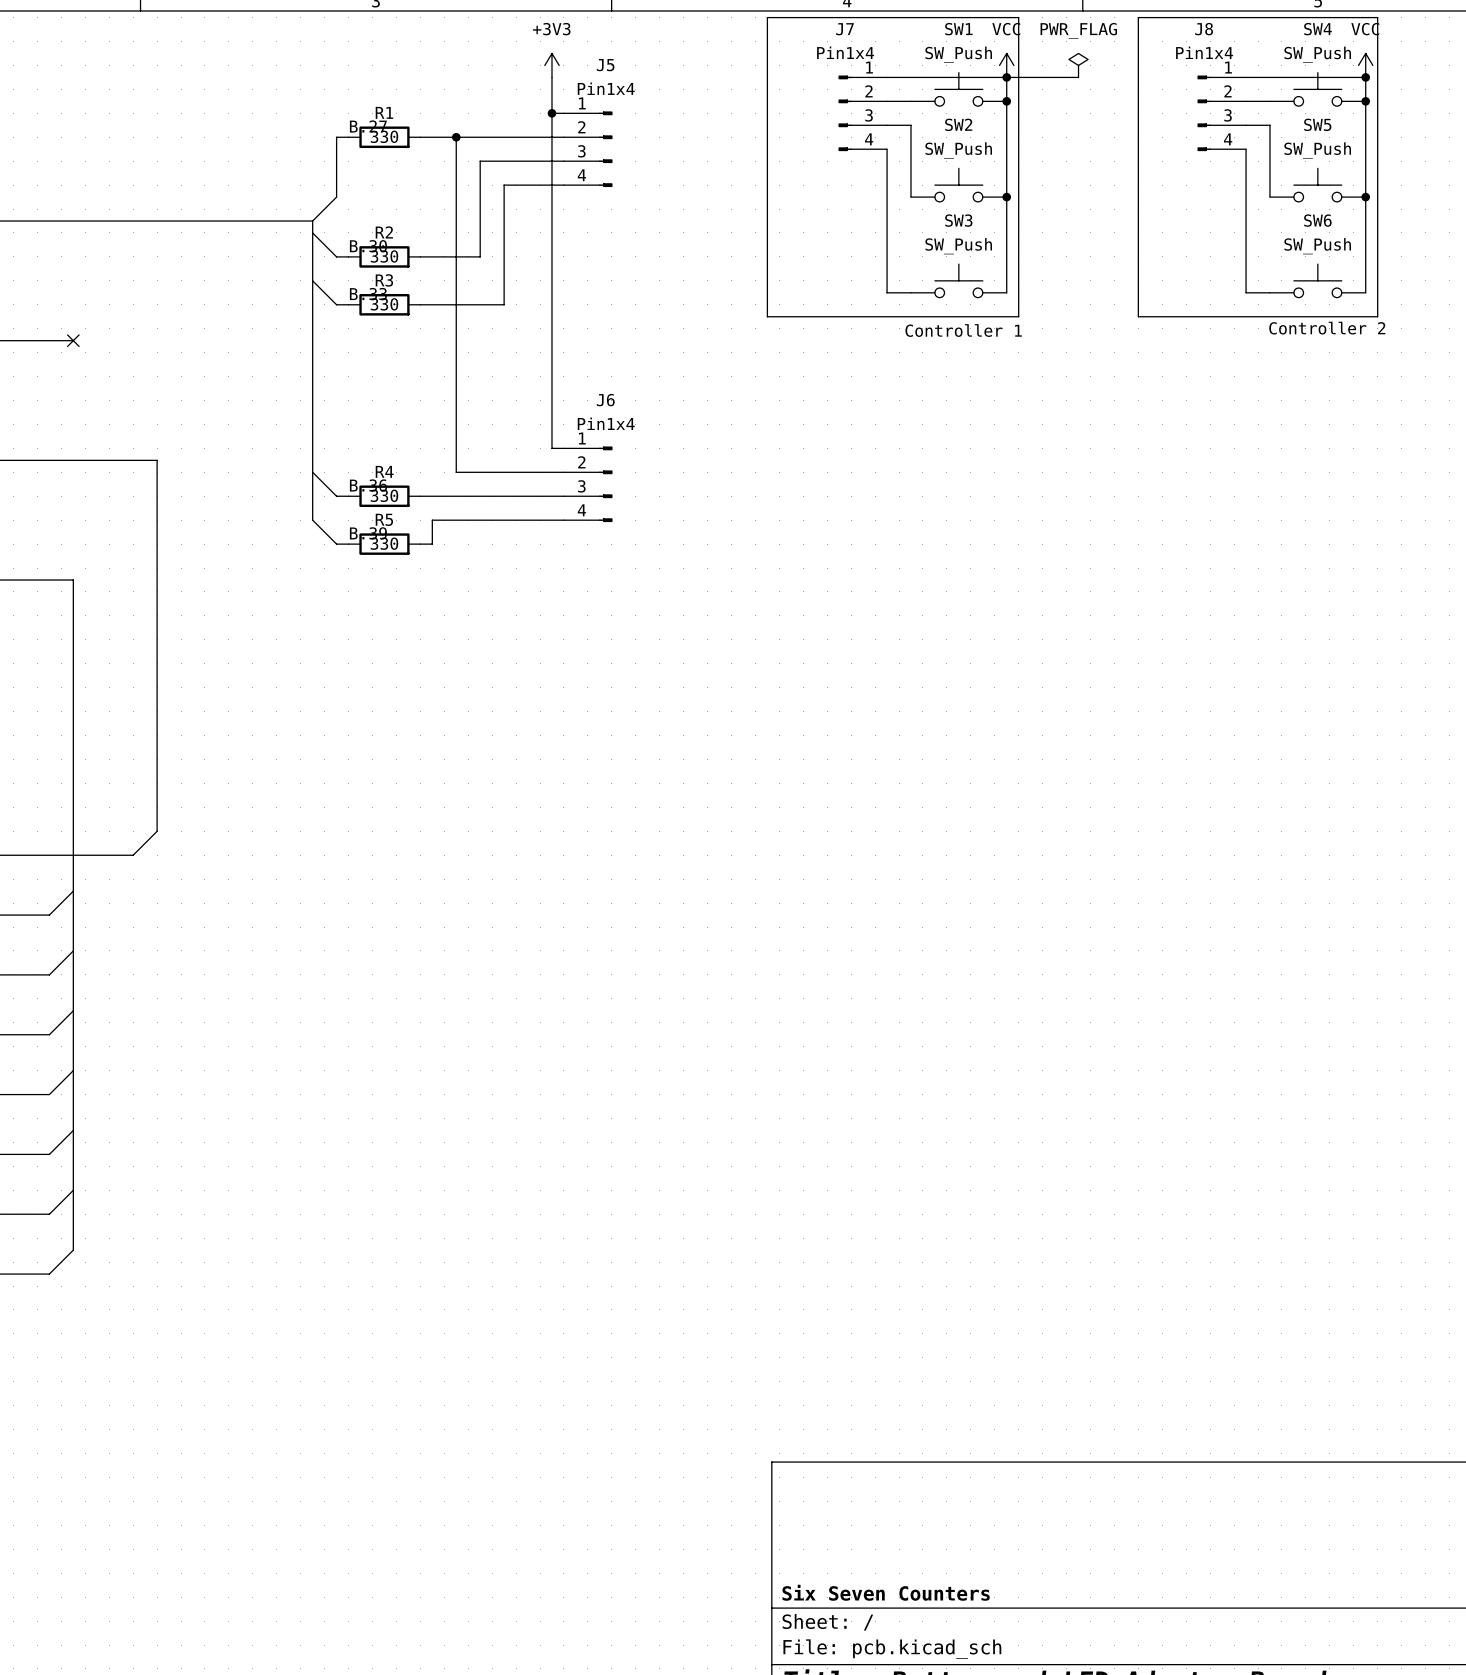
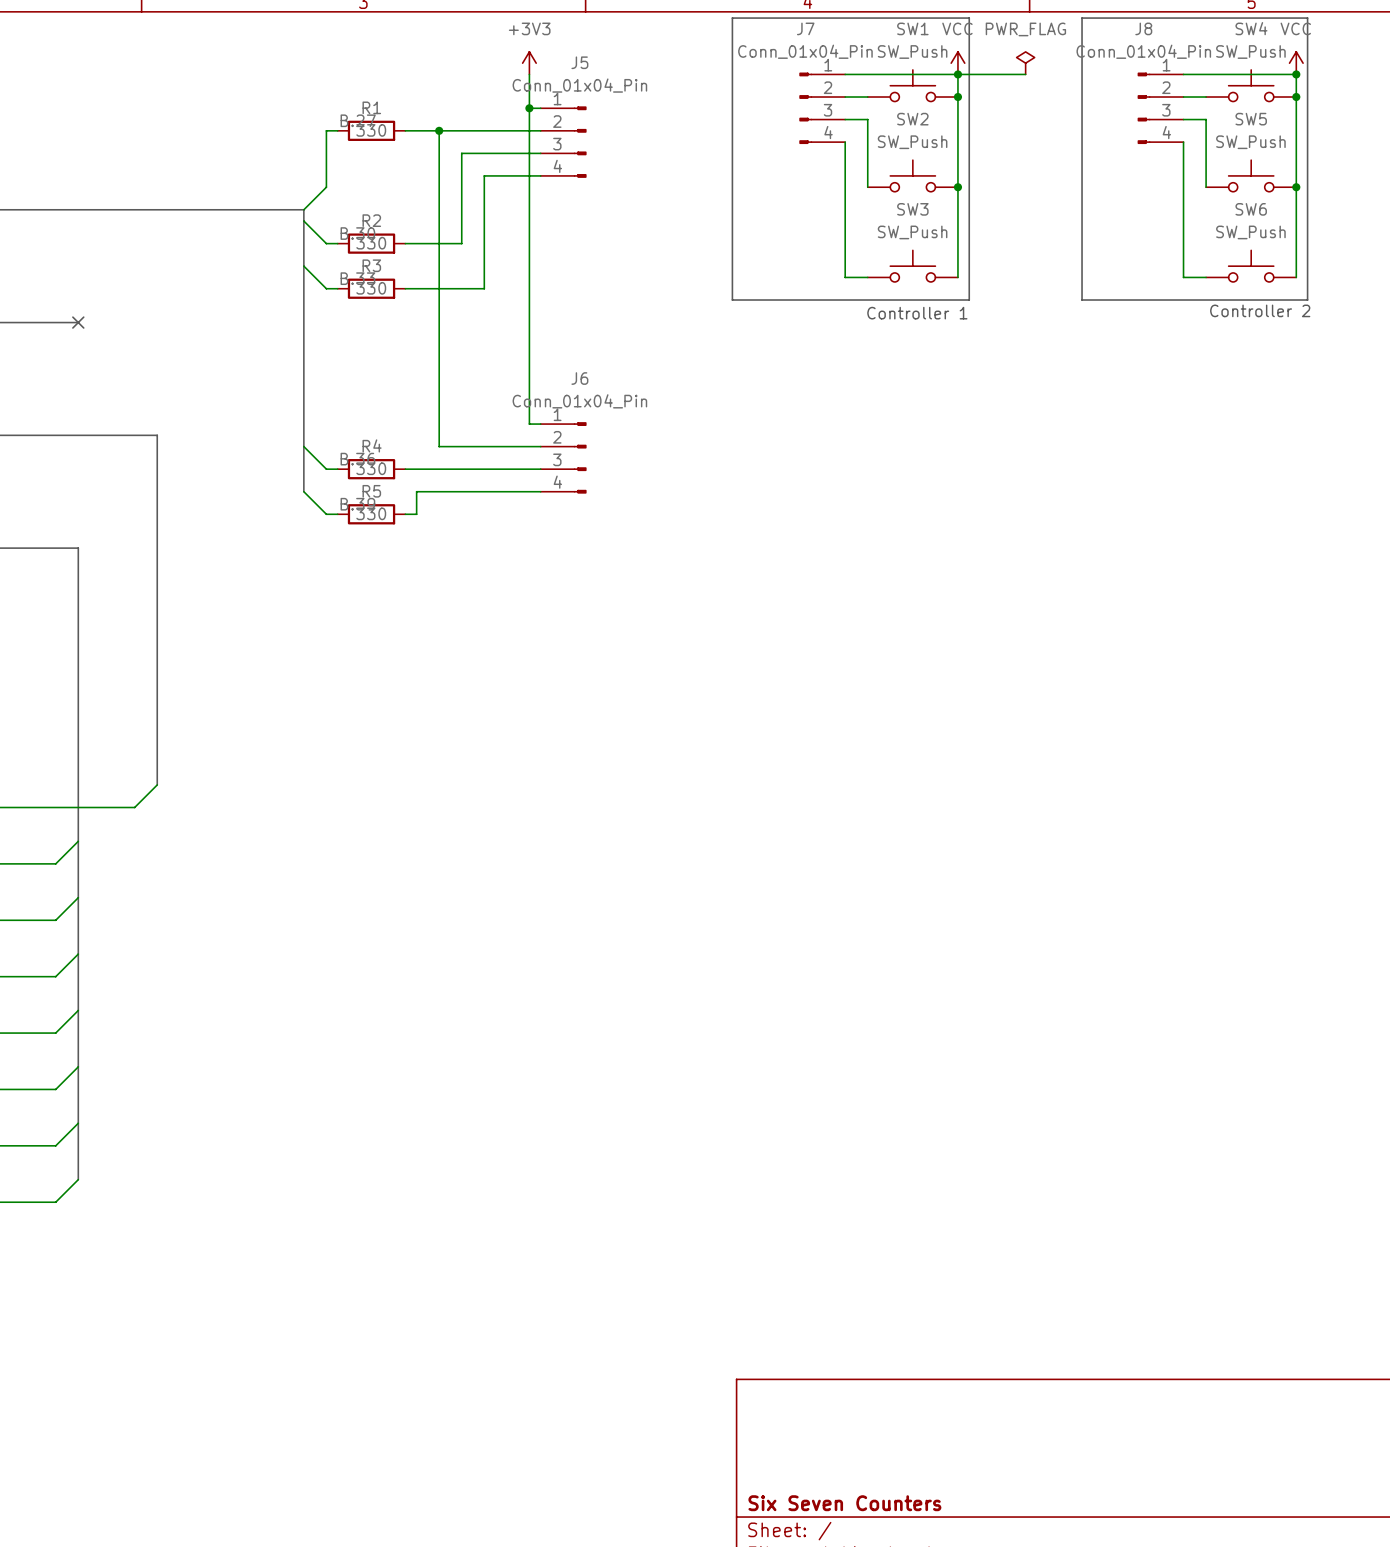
J7 value: Pin1x4 (845, 52) -> Conn_01x04_Pin (805, 51)
J8 value: Pin1x4 (1204, 52) -> Conn_01x04_Pin (1143, 51)
J5 value: Pin1x4 (606, 88) -> Conn_01x04_Pin (579, 85)
J6 value: Pin1x4 (606, 423) -> Conn_01x04_Pin (579, 401)

